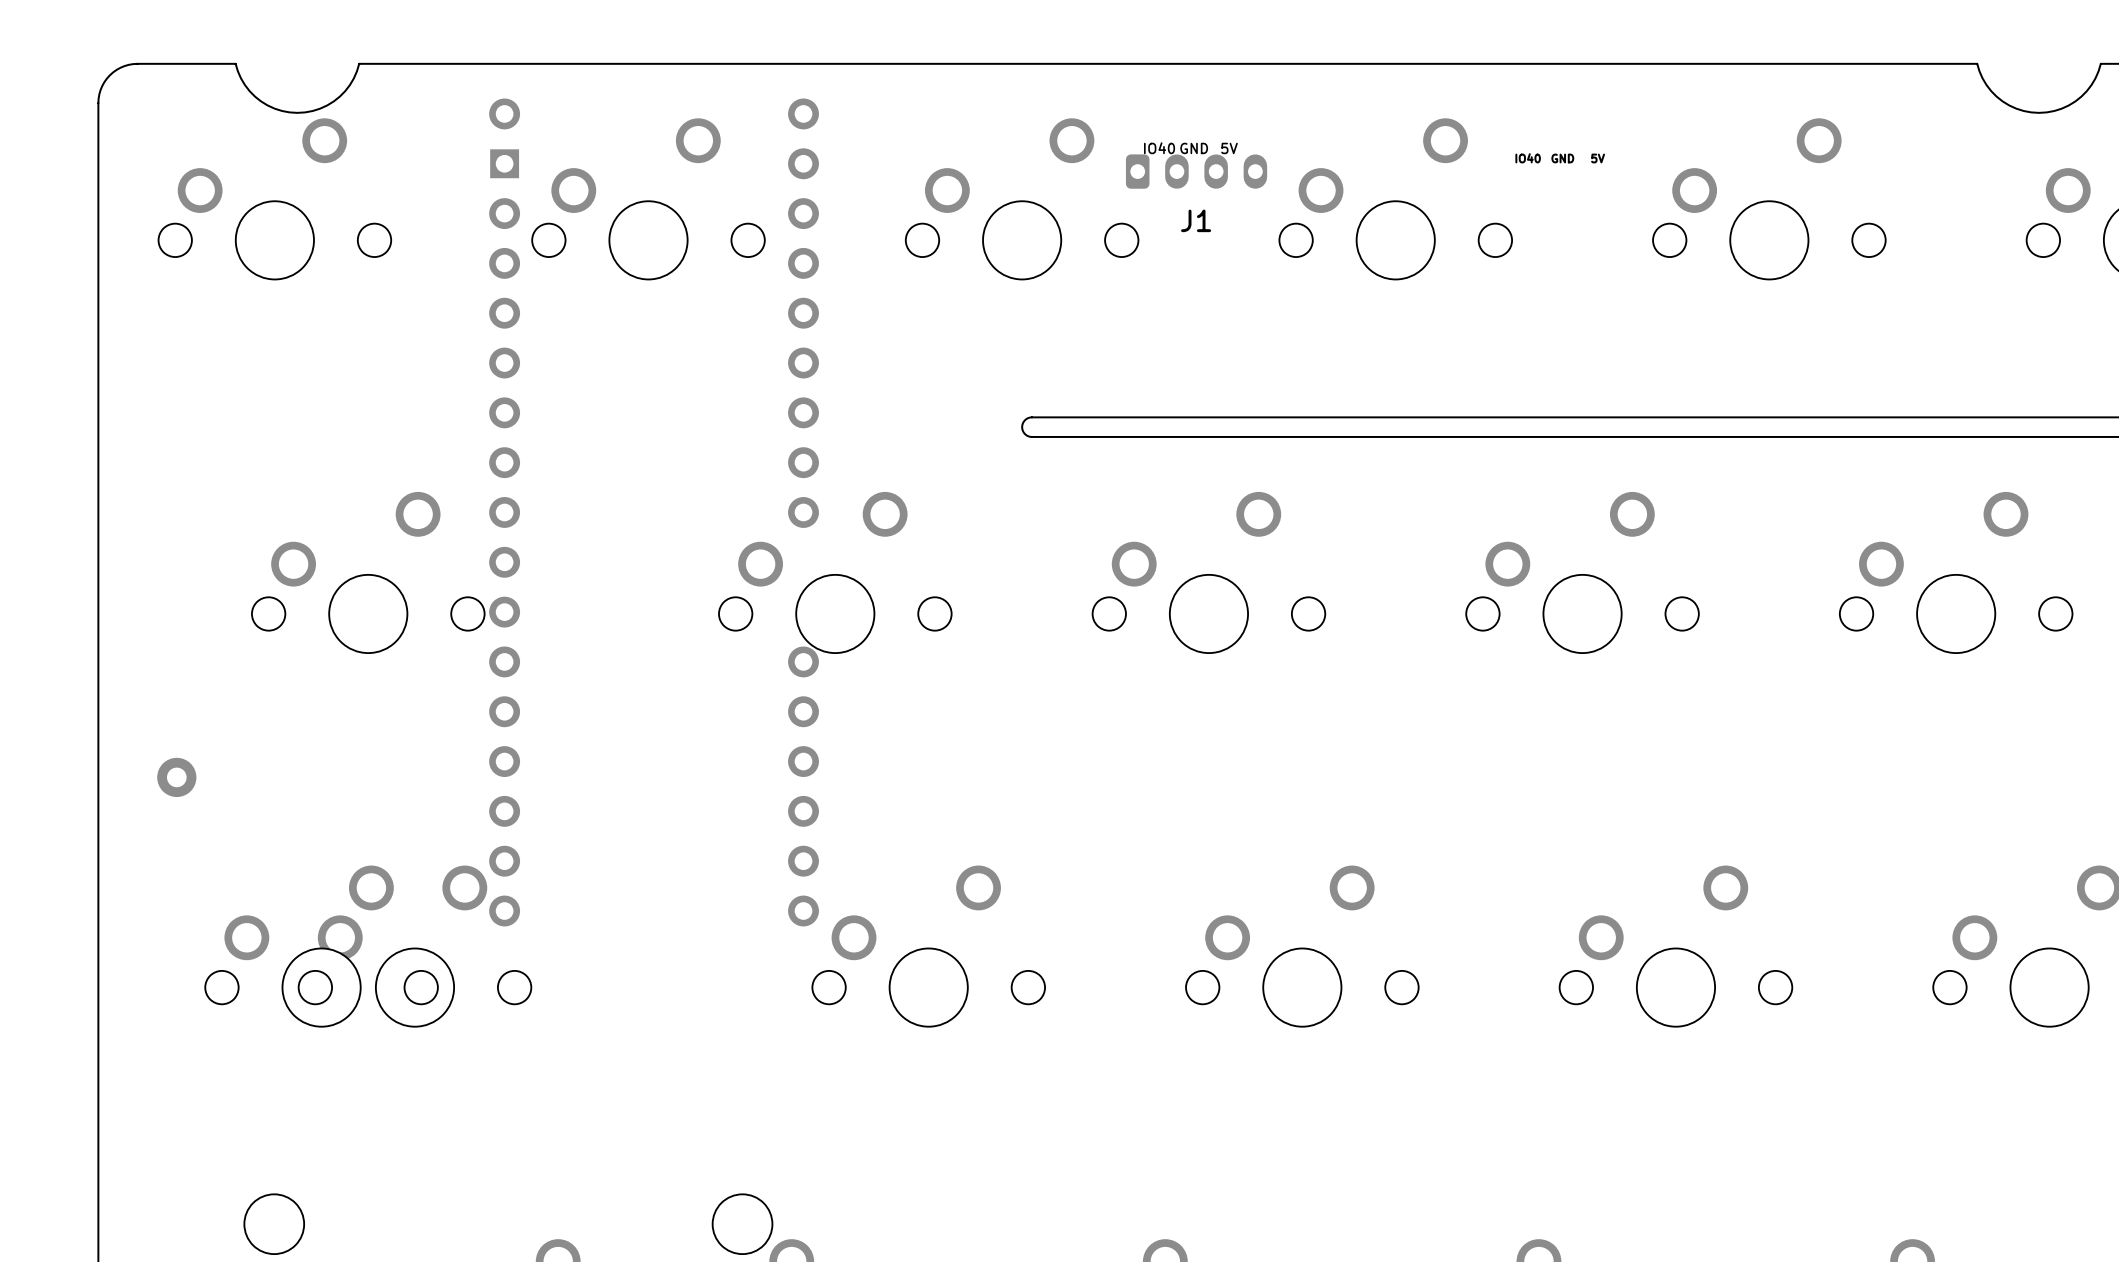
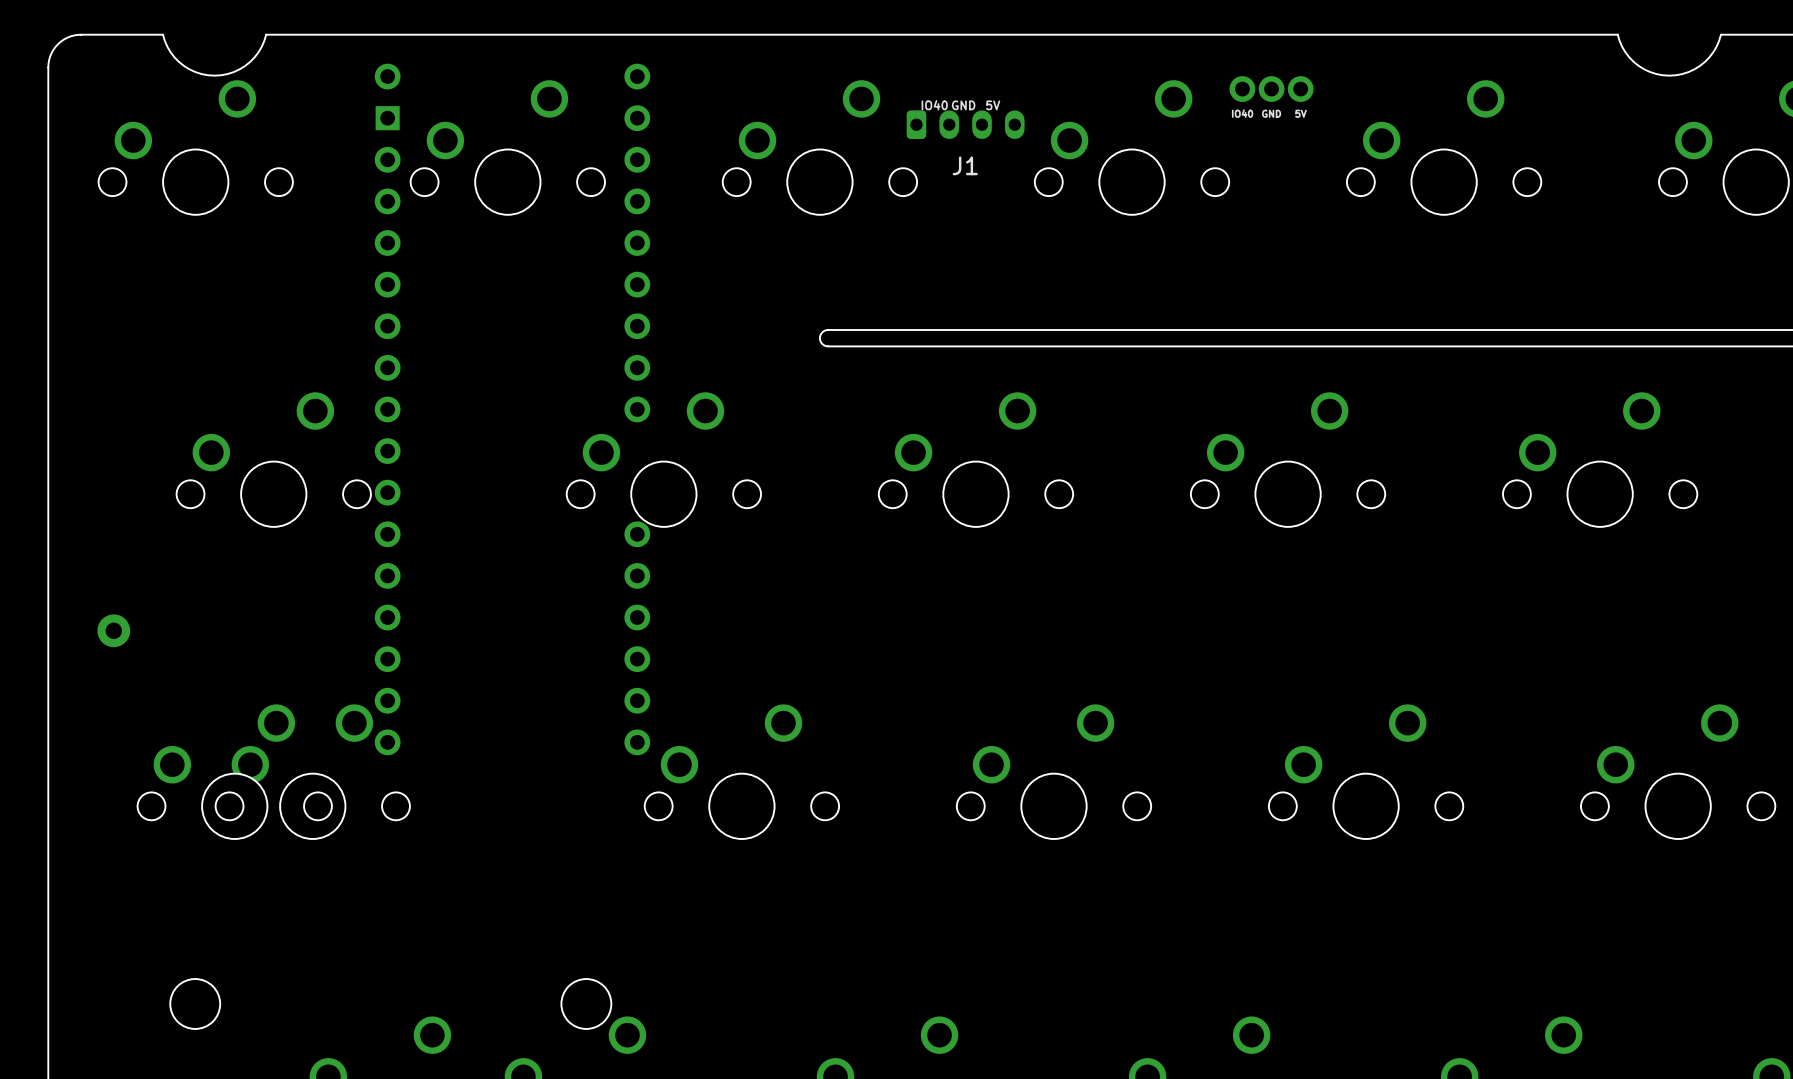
part: none -> (1242, 89)
part: none -> (1271, 89)
part: none -> (1300, 89)

